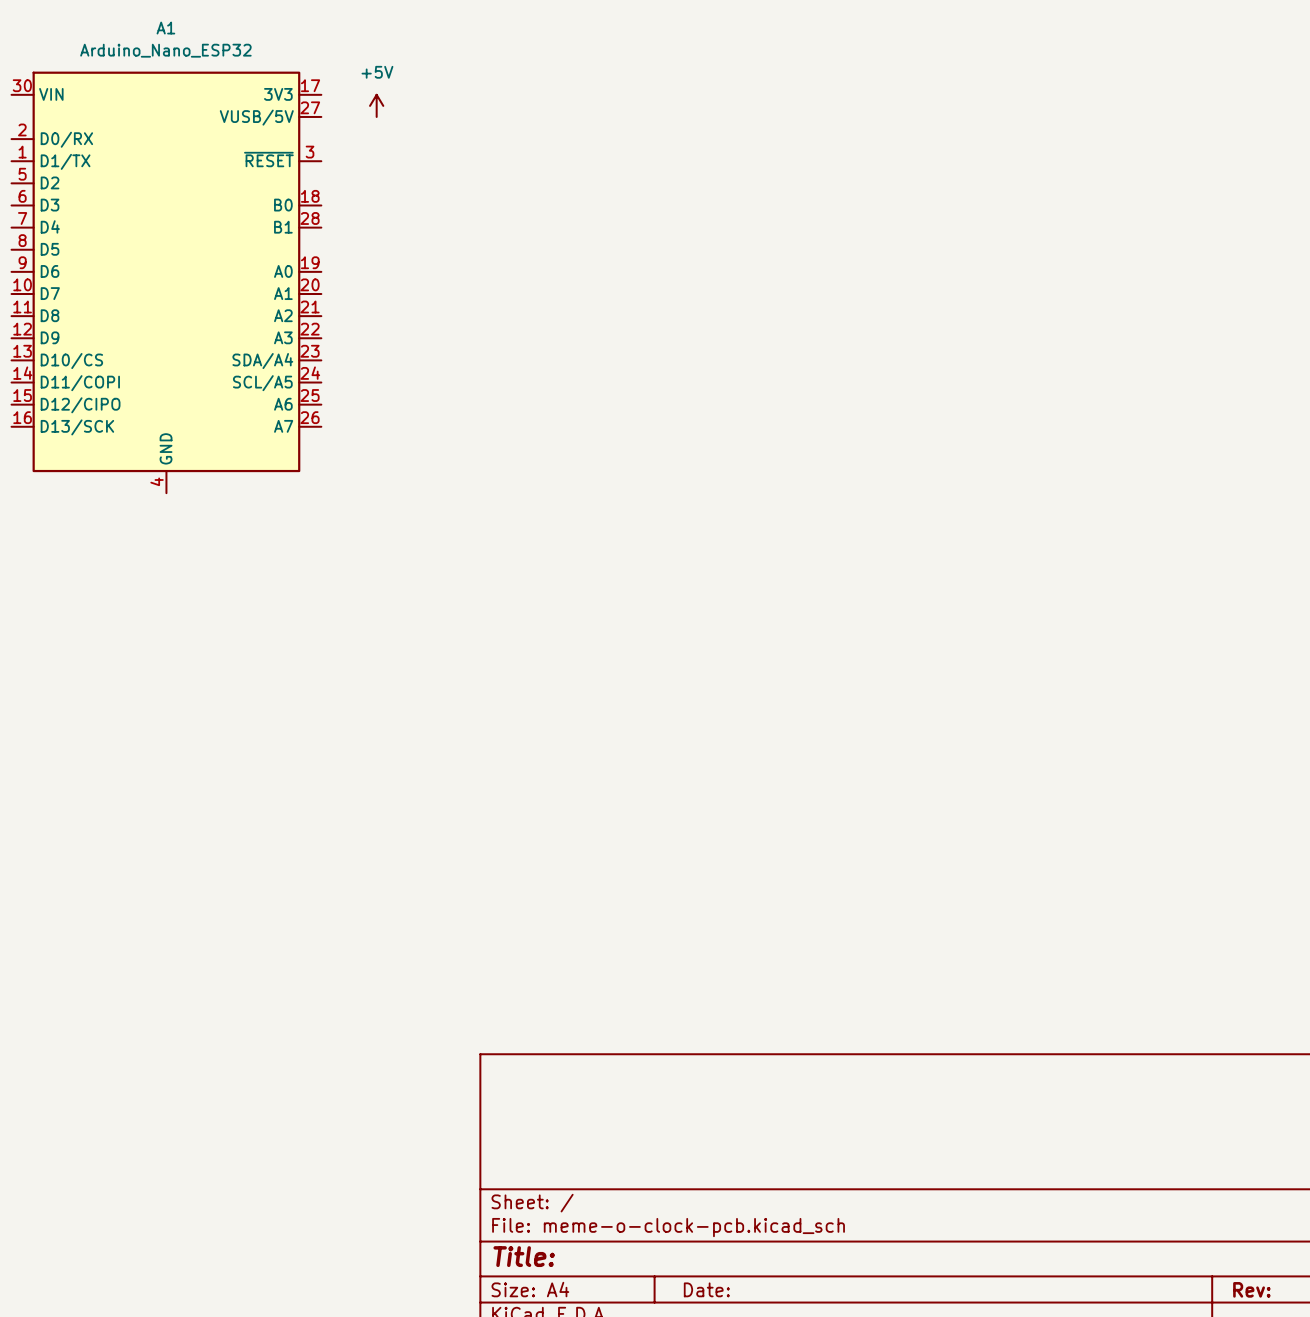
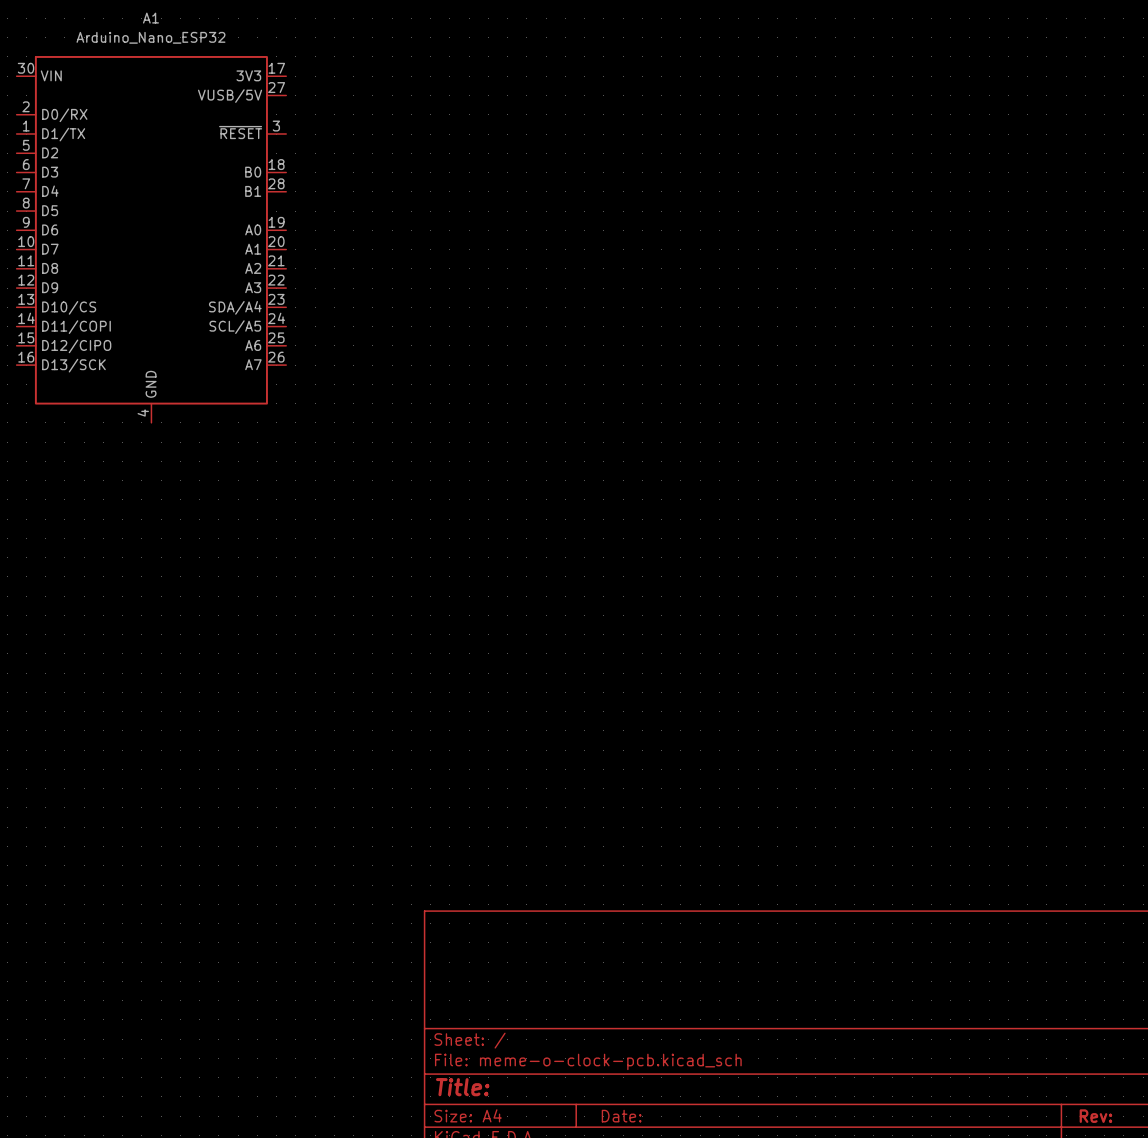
power symbol: +5V (376, 105) -> none

